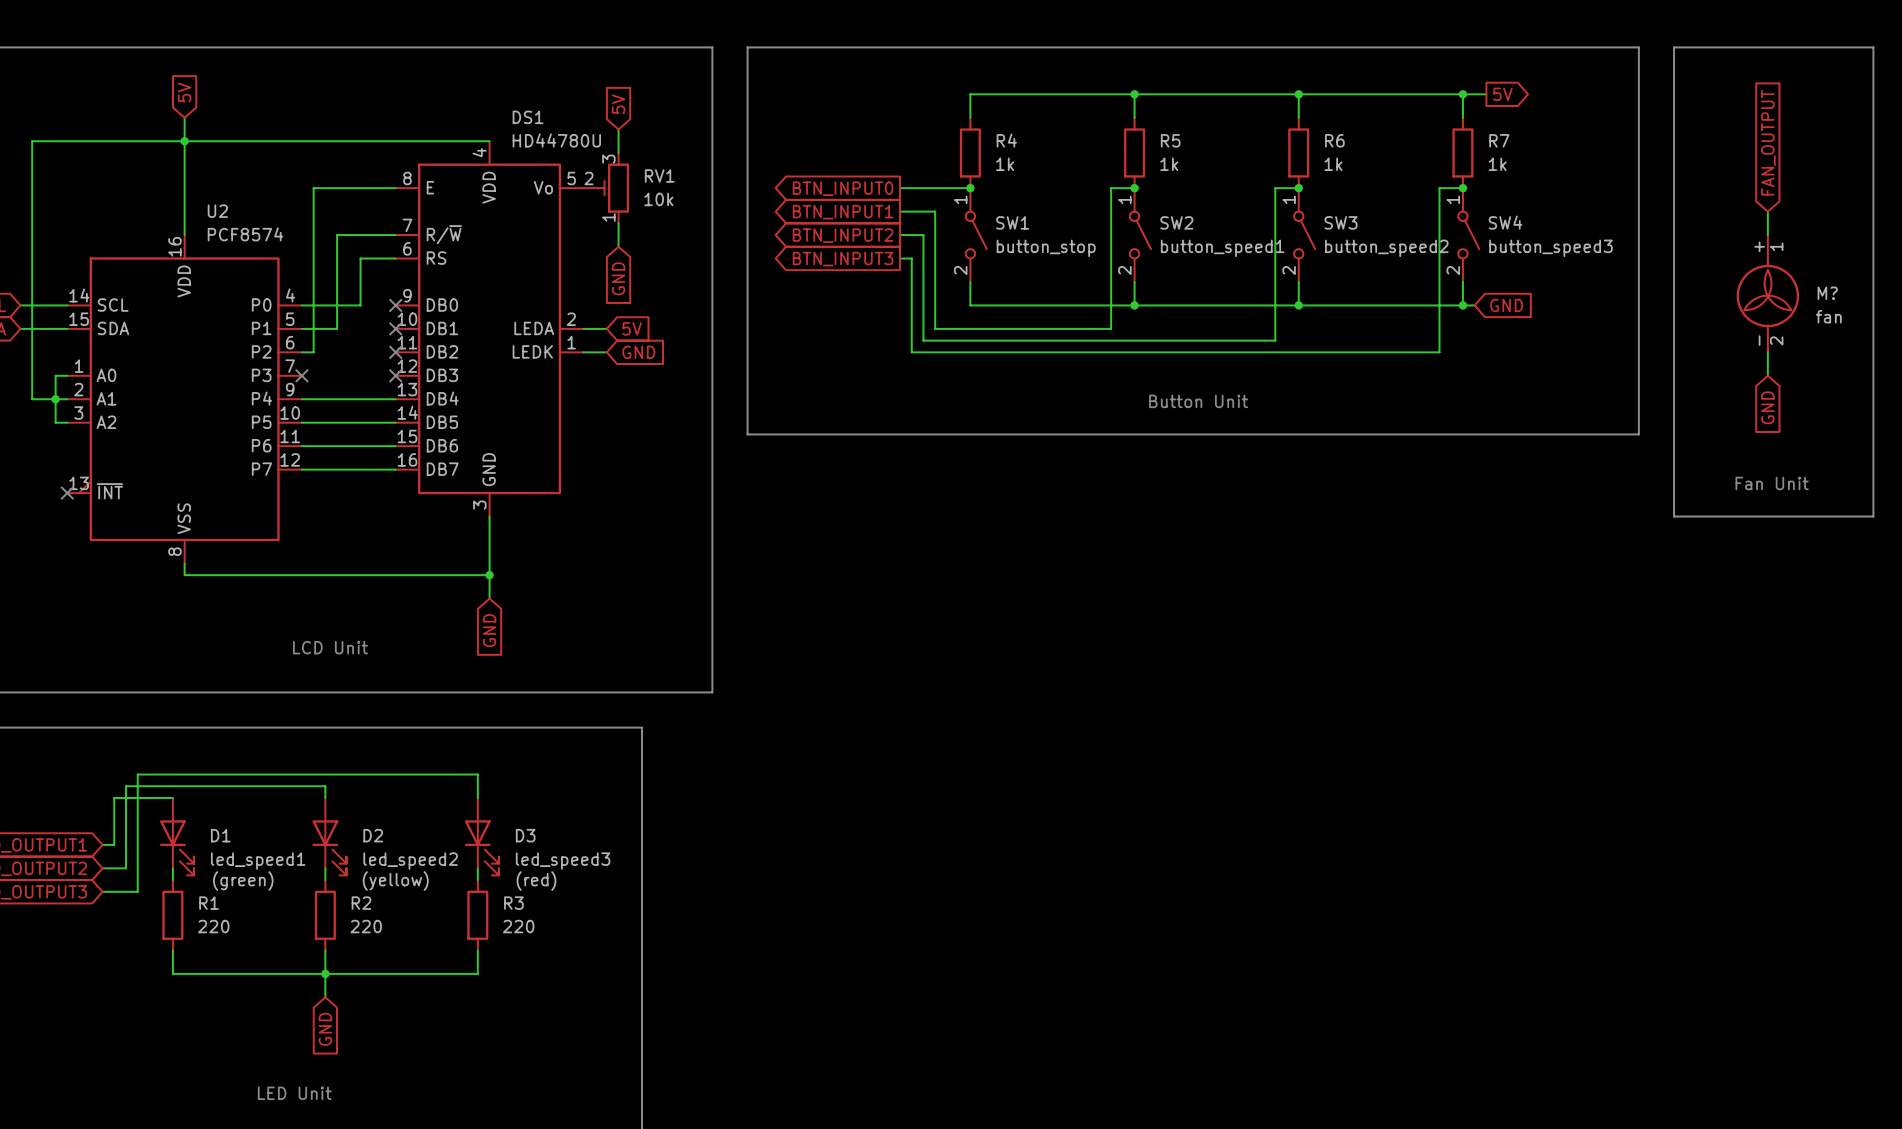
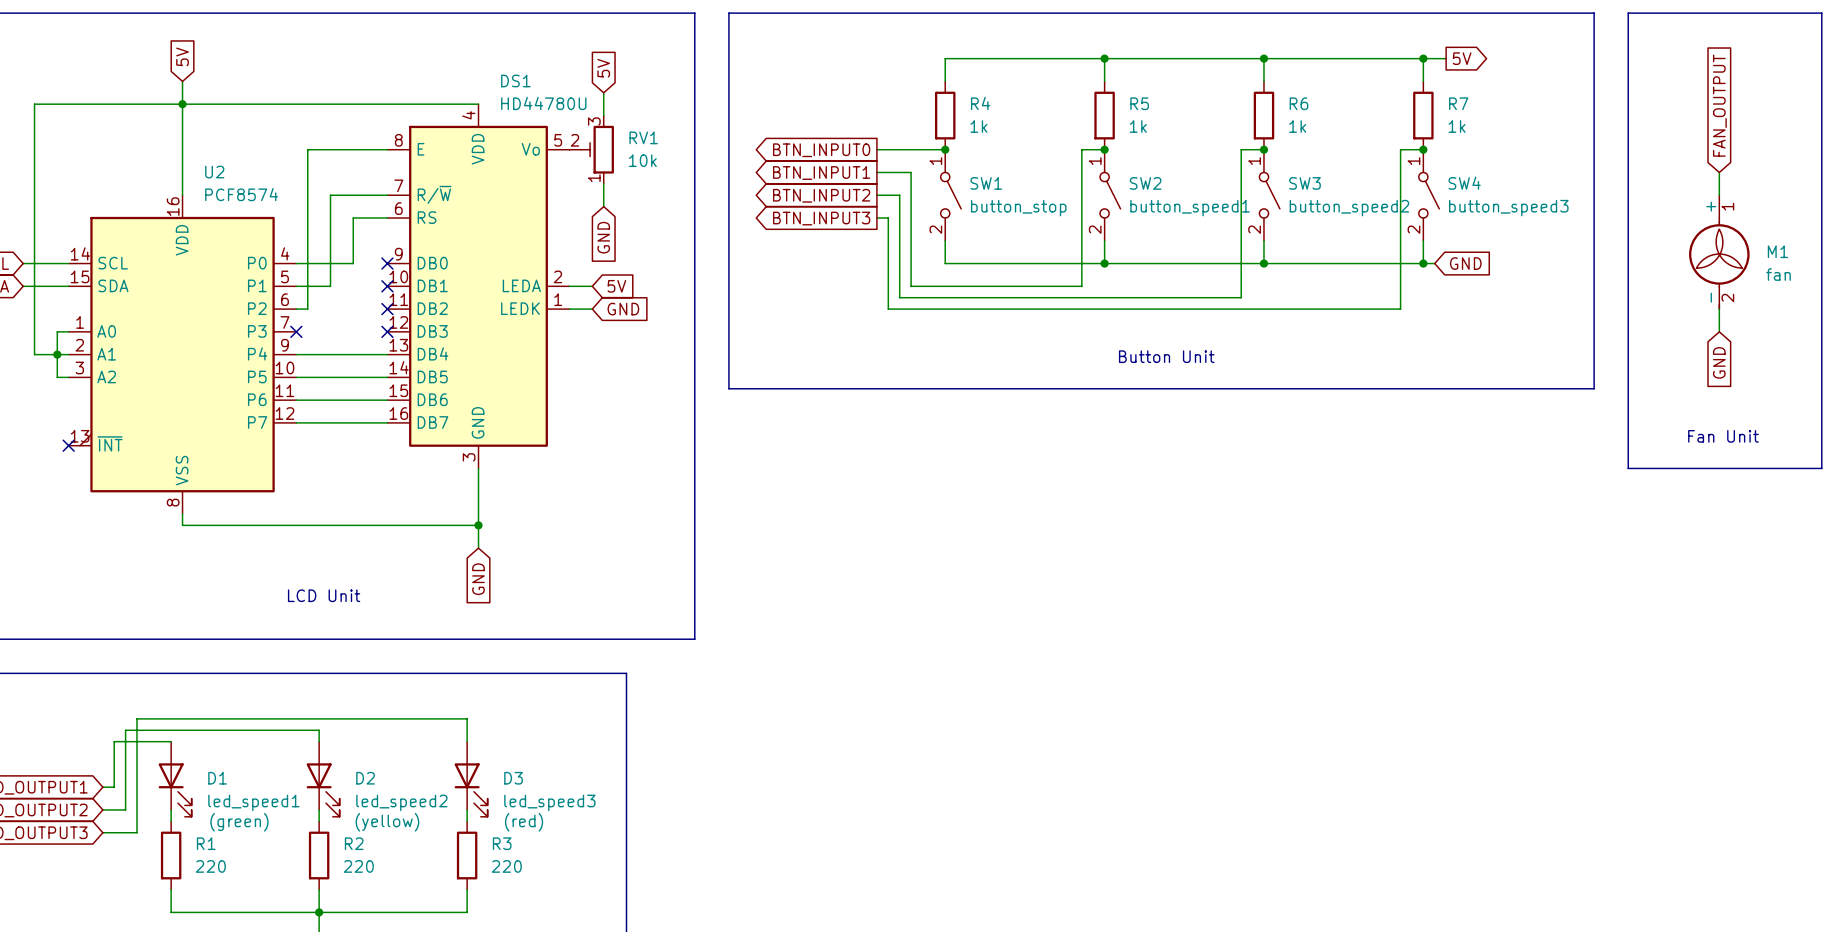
M? name: M? (1827, 293) -> M1 (1777, 251)

